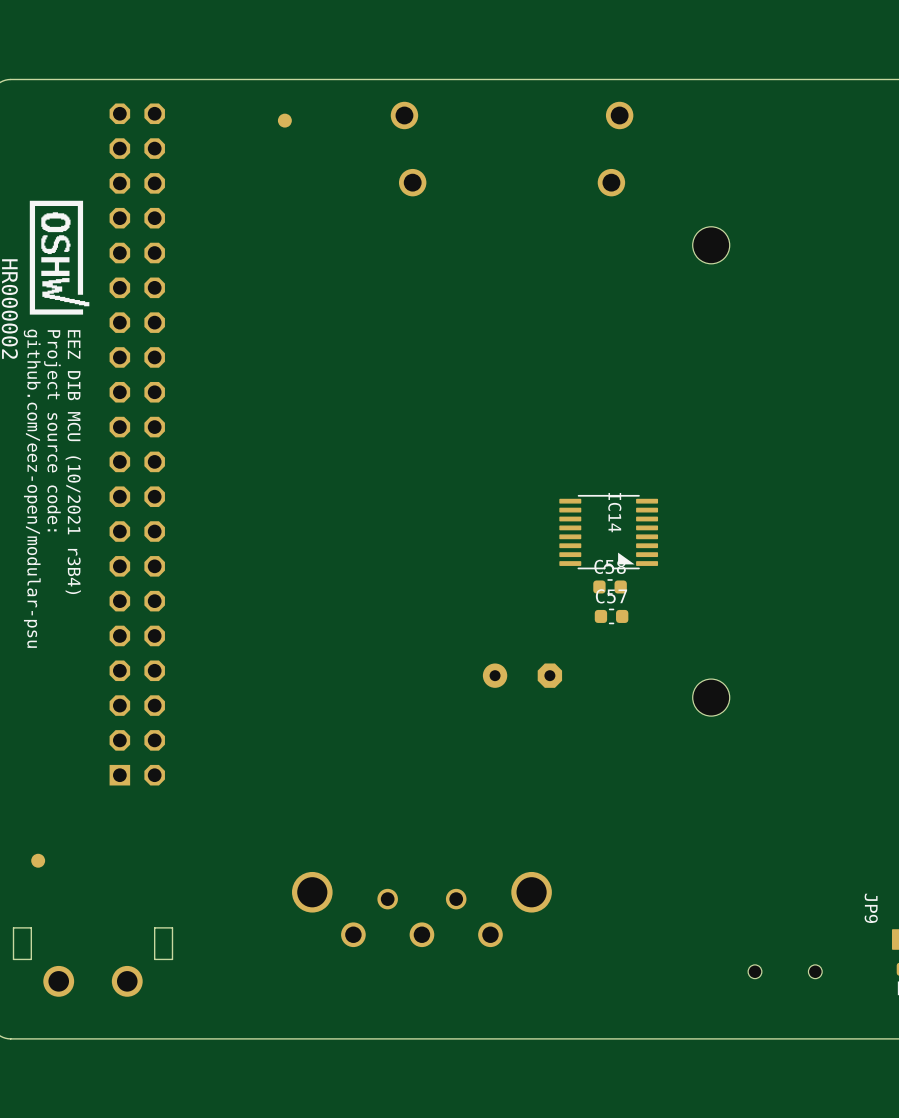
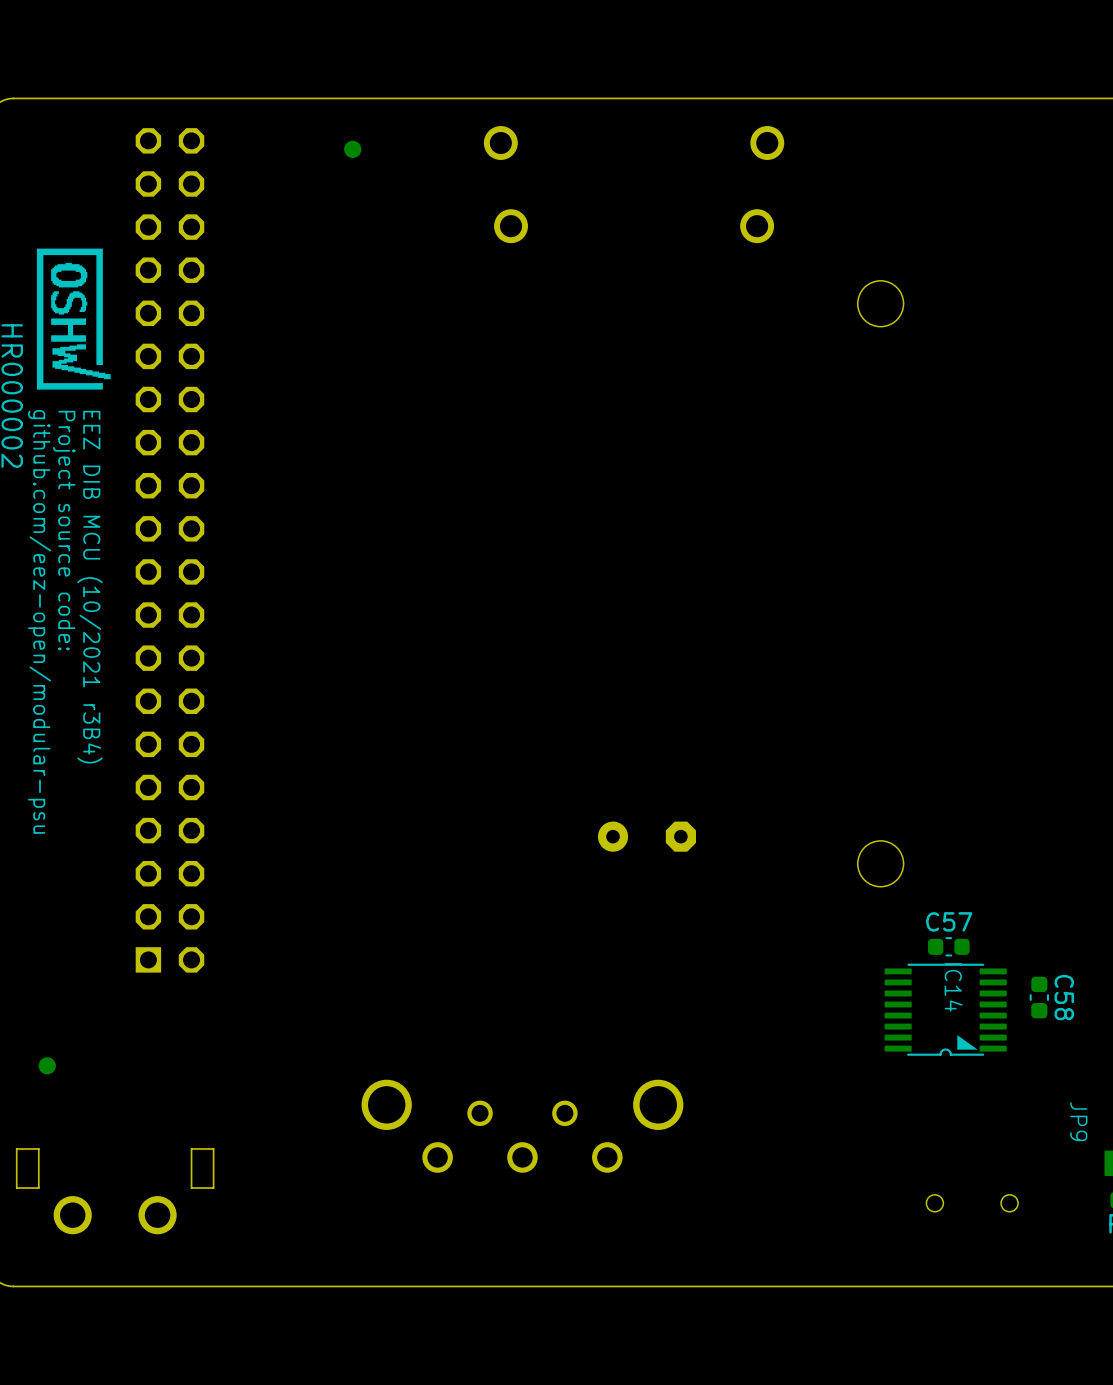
IC14 position: (608, 532) -> (945, 1009)
C58 rotation: 0° (610, 586) -> 90° clockwise (1039, 997)
C58 position: (610, 586) -> (1039, 997)
C57 position: (611, 616) -> (948, 946)

